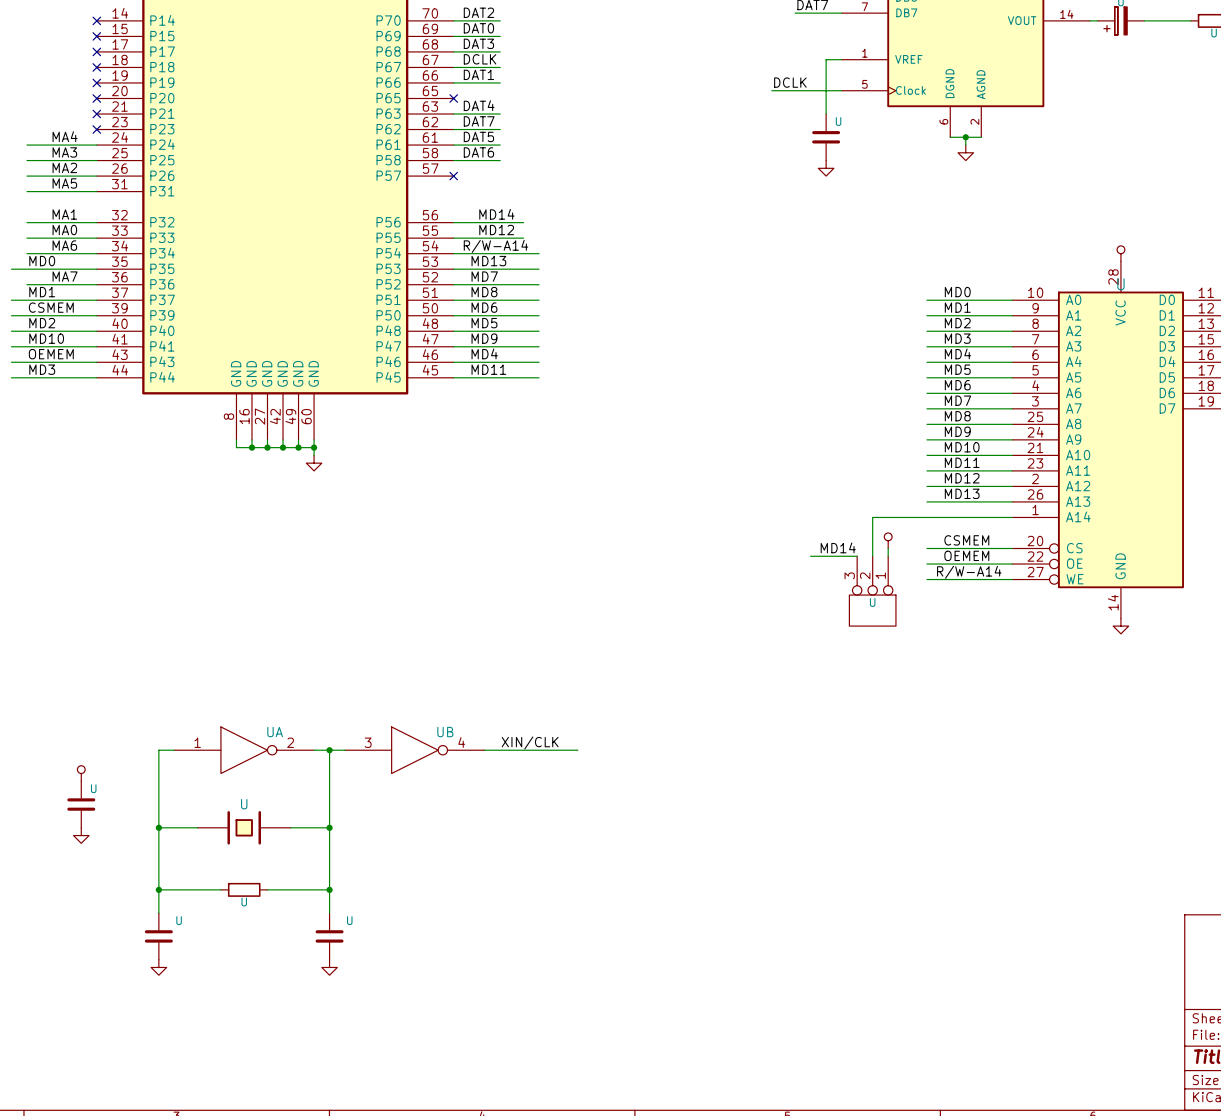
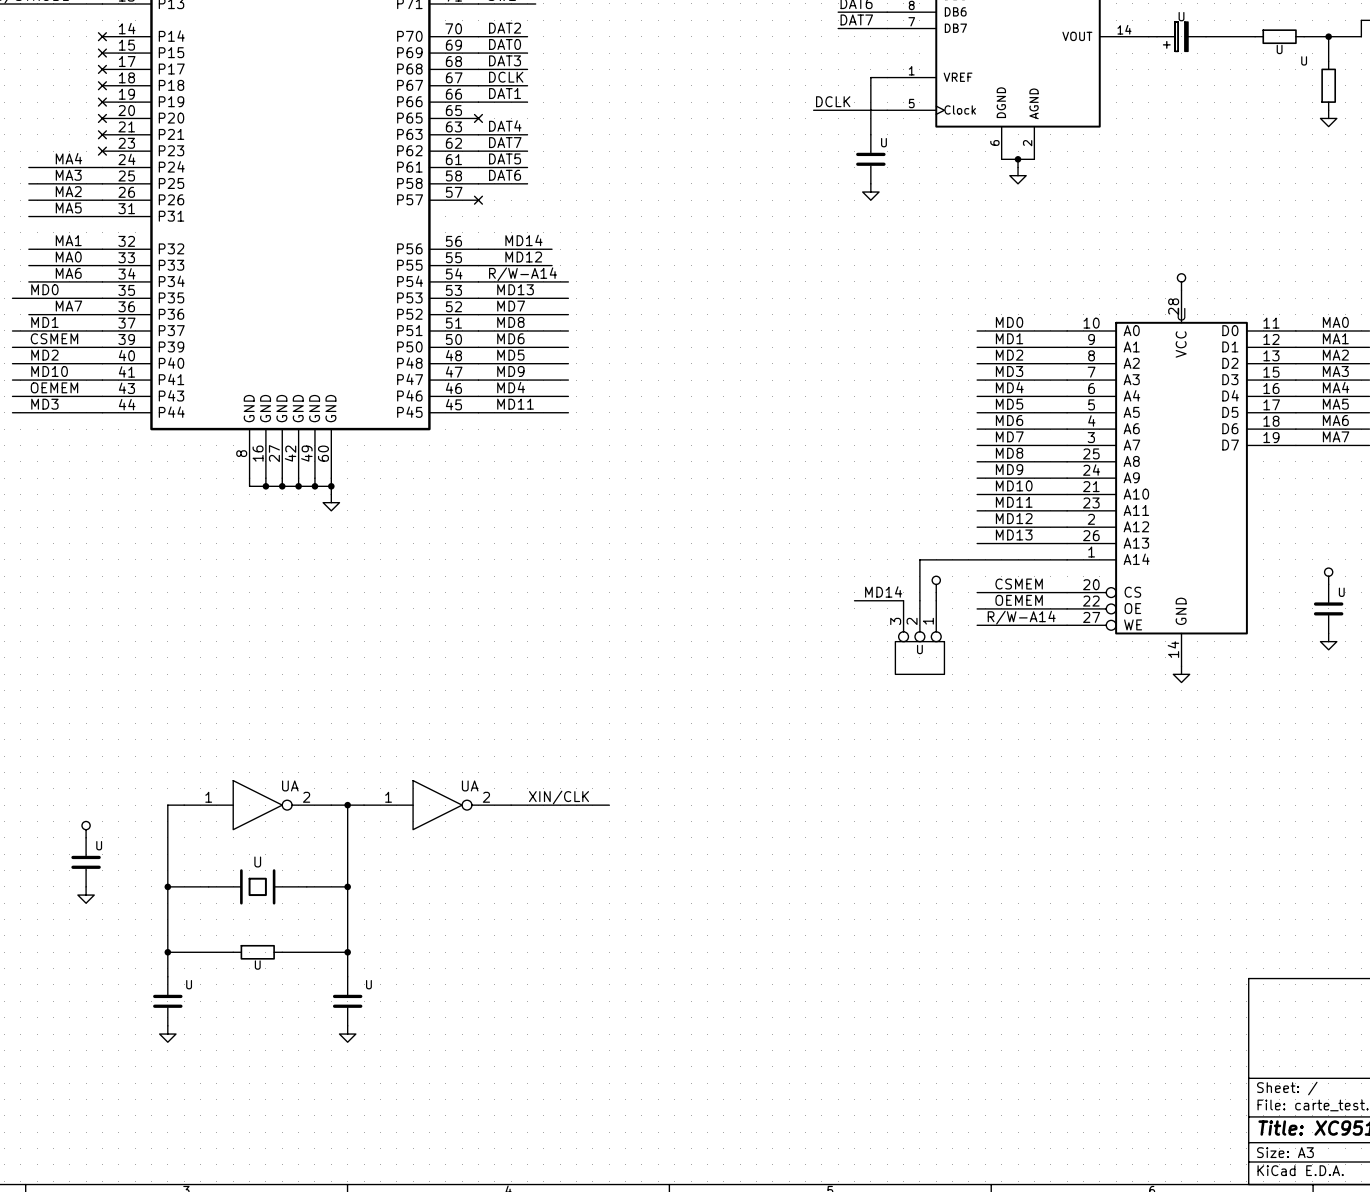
UB name: UB (445, 732) -> UA (470, 785)
UB pin number: 3 (368, 742) -> 1 (388, 797)
UB pin number: 4 (461, 742) -> 2 (486, 797)

